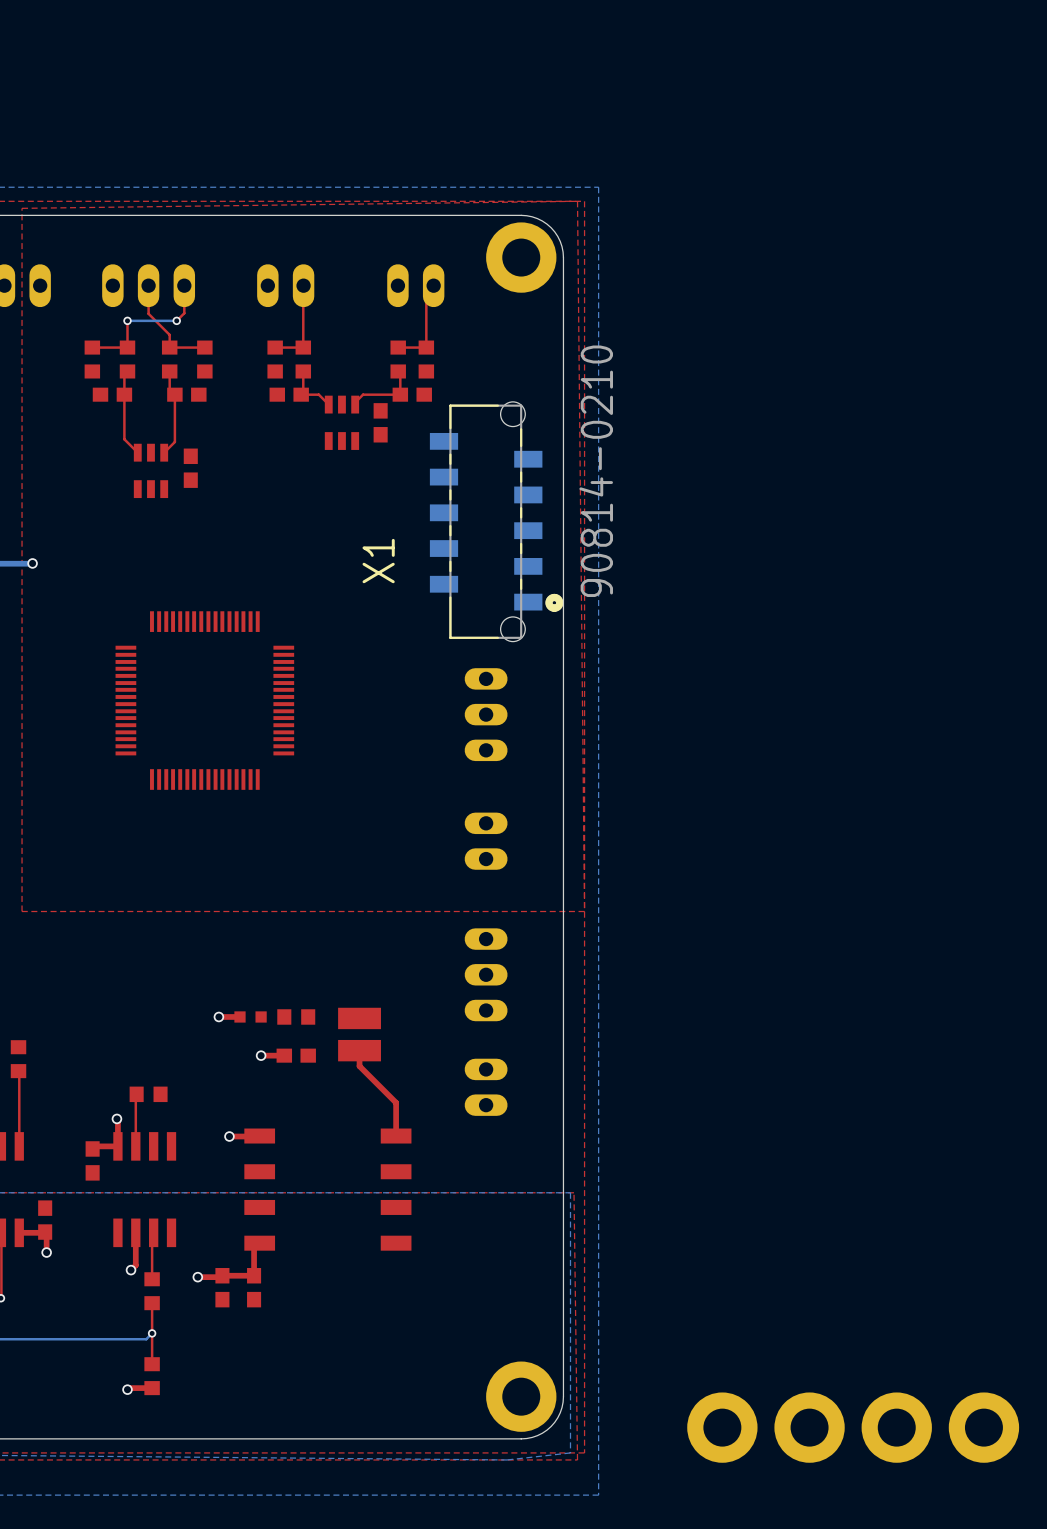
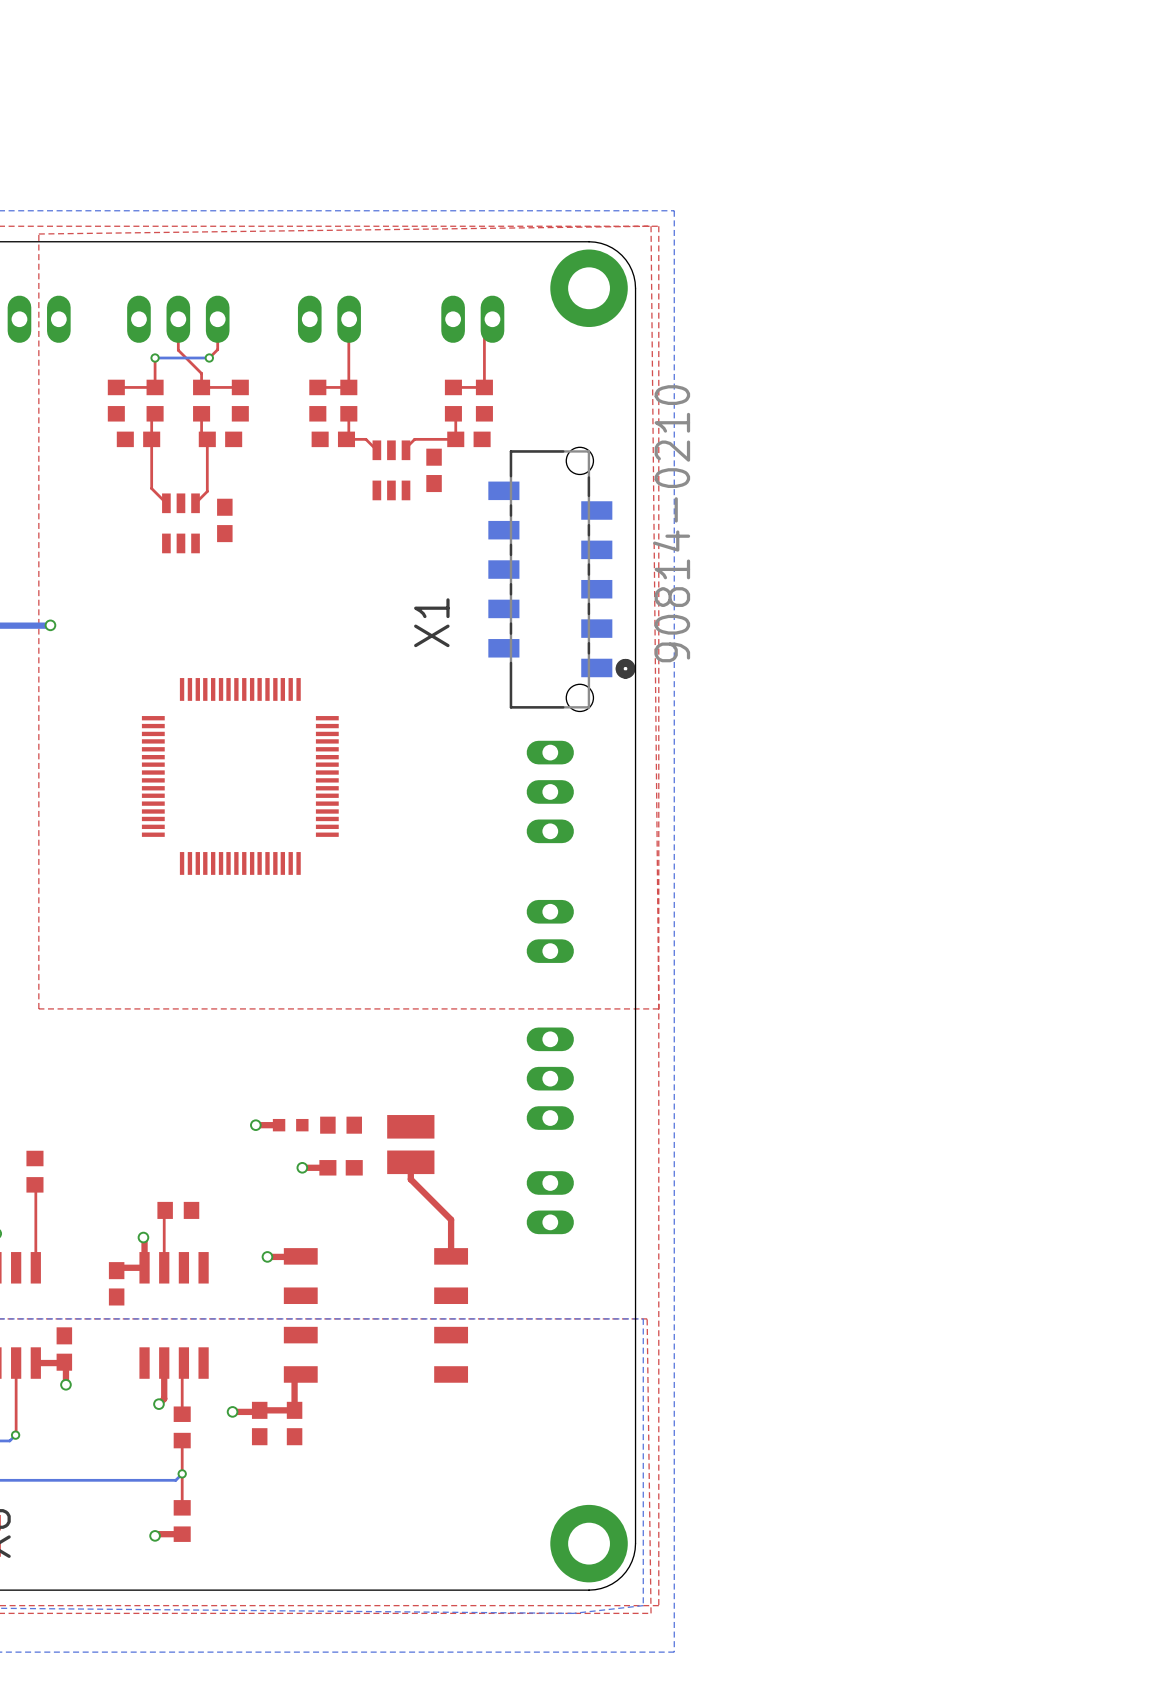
part: (722, 1427) -> none
part: (809, 1427) -> none
part: (896, 1427) -> none
part: (983, 1427) -> none

